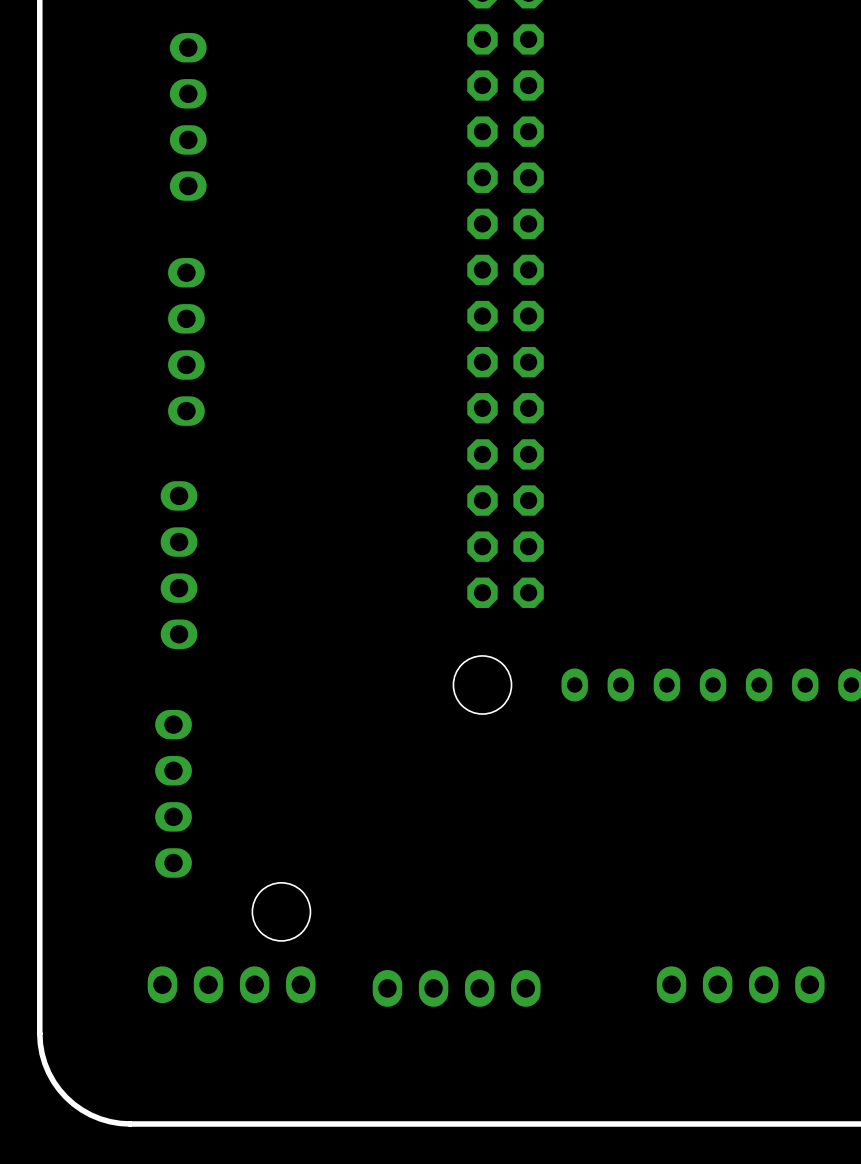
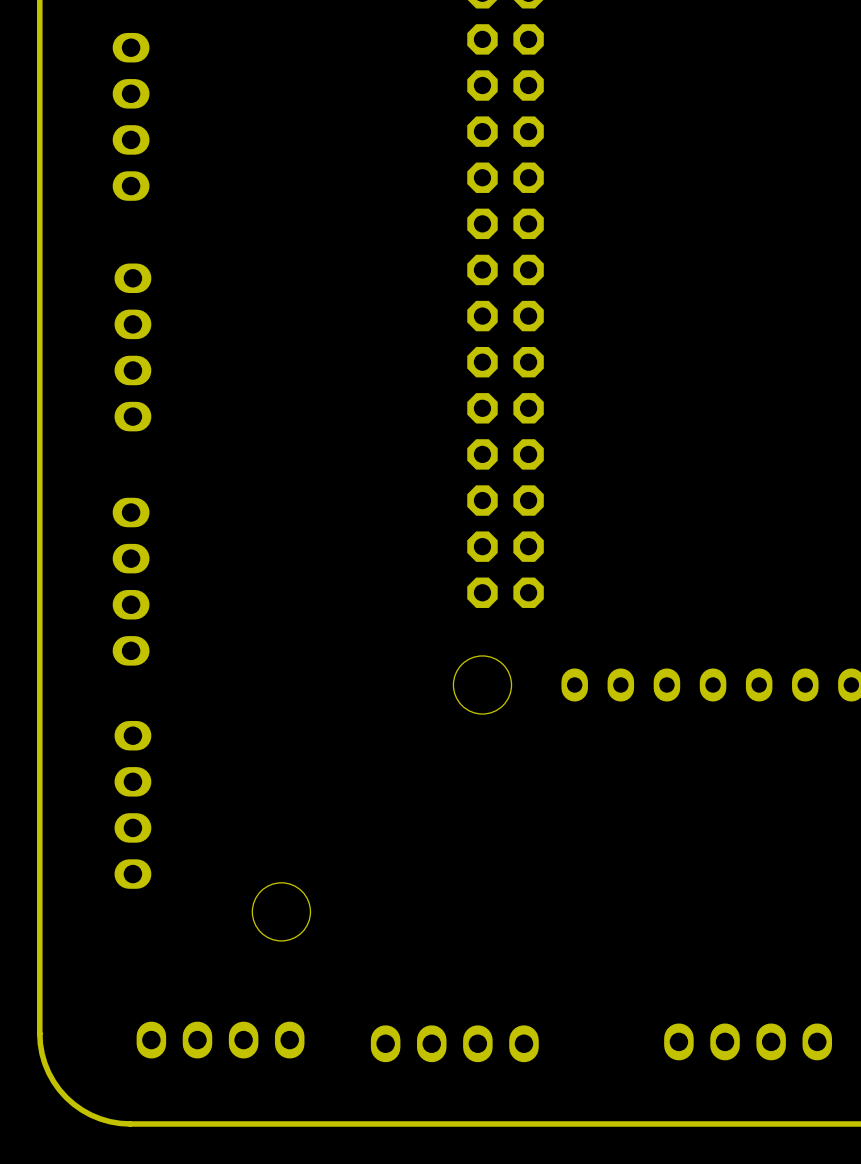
part position: (188, 116) -> (131, 116)
part position: (186, 341) -> (132, 347)
part position: (179, 565) -> (131, 581)
part position: (173, 793) -> (132, 804)
part position: (231, 984) -> (220, 1040)
part position: (740, 984) -> (748, 1041)
part position: (456, 988) -> (454, 1043)

